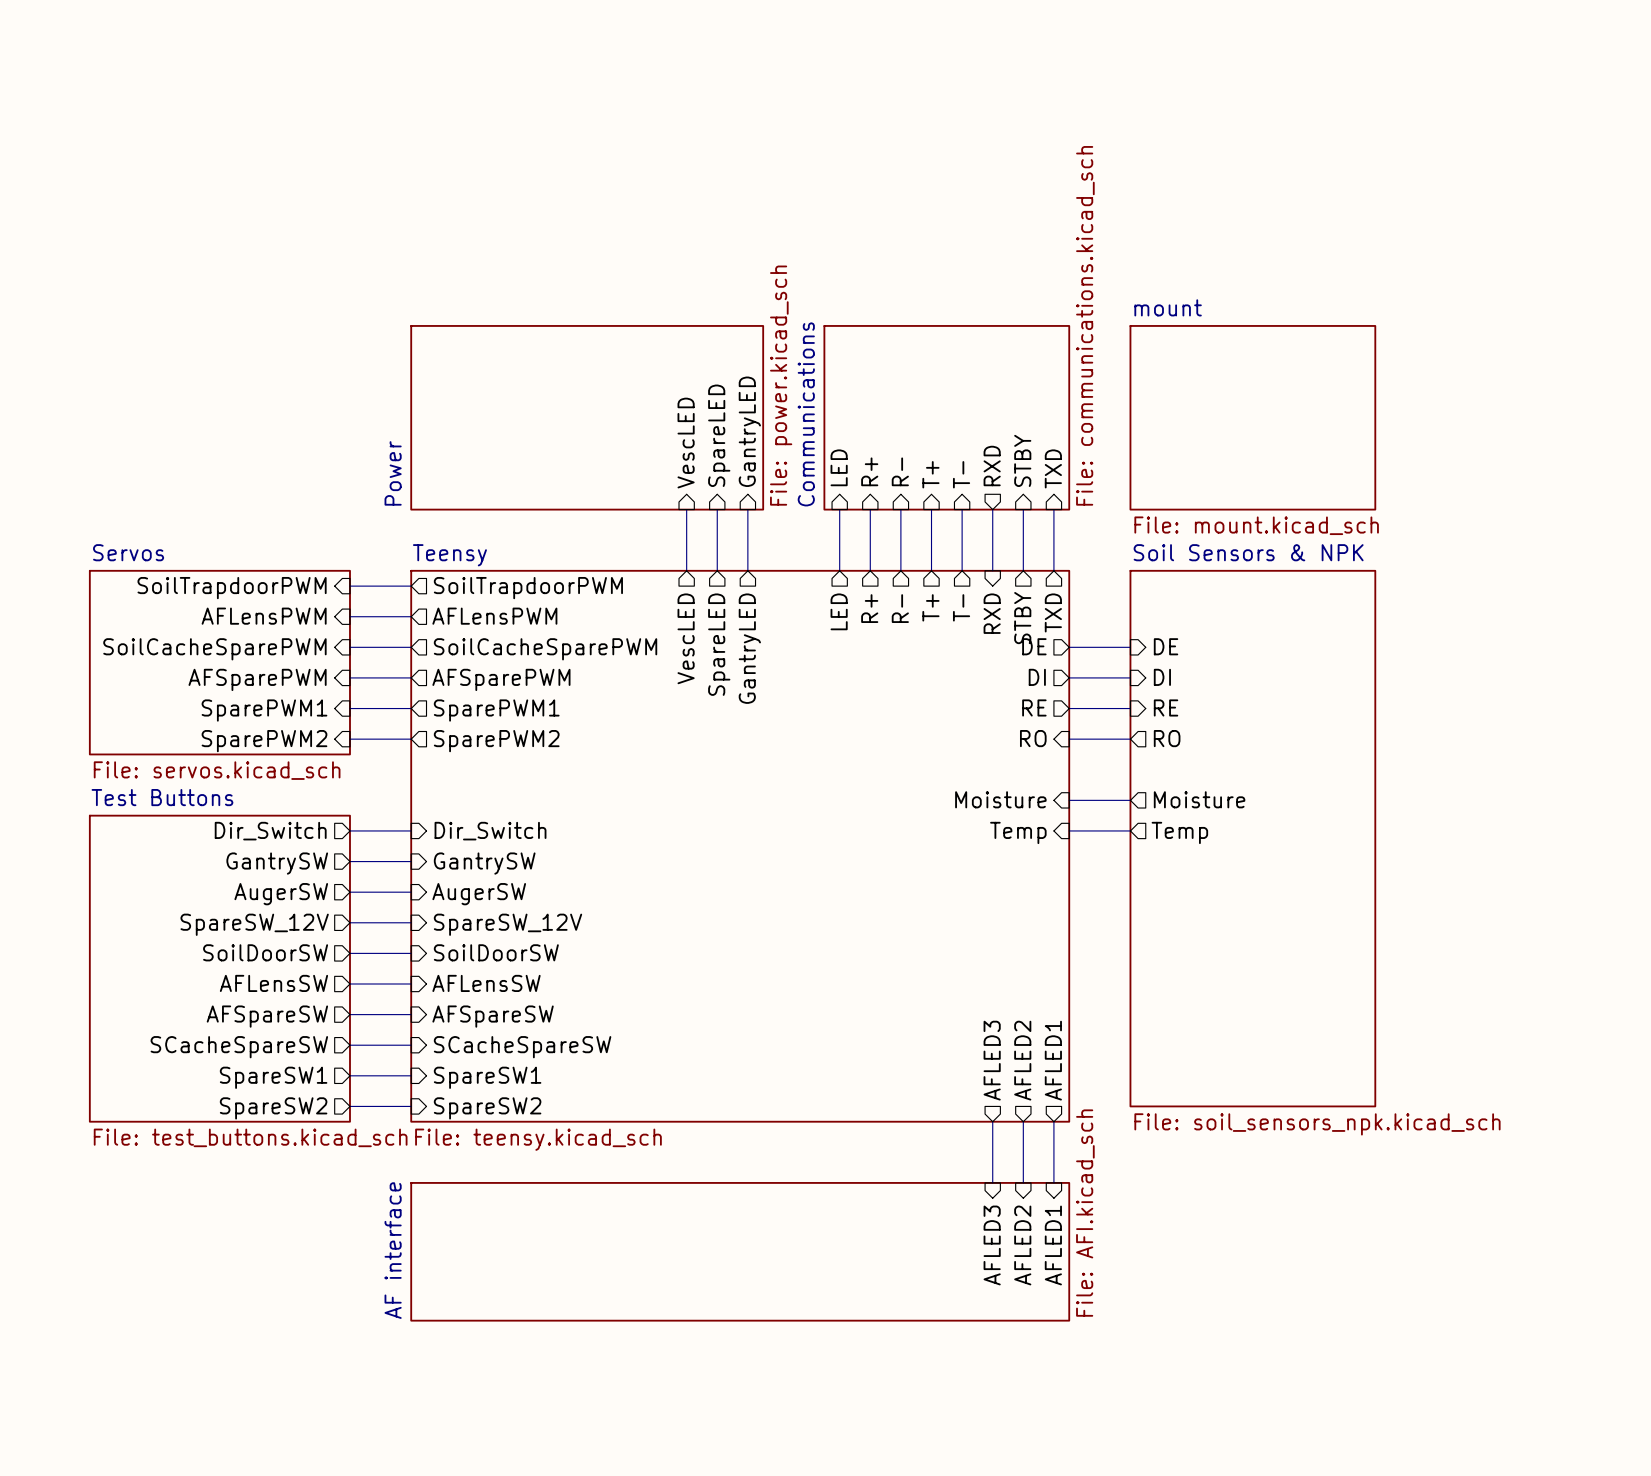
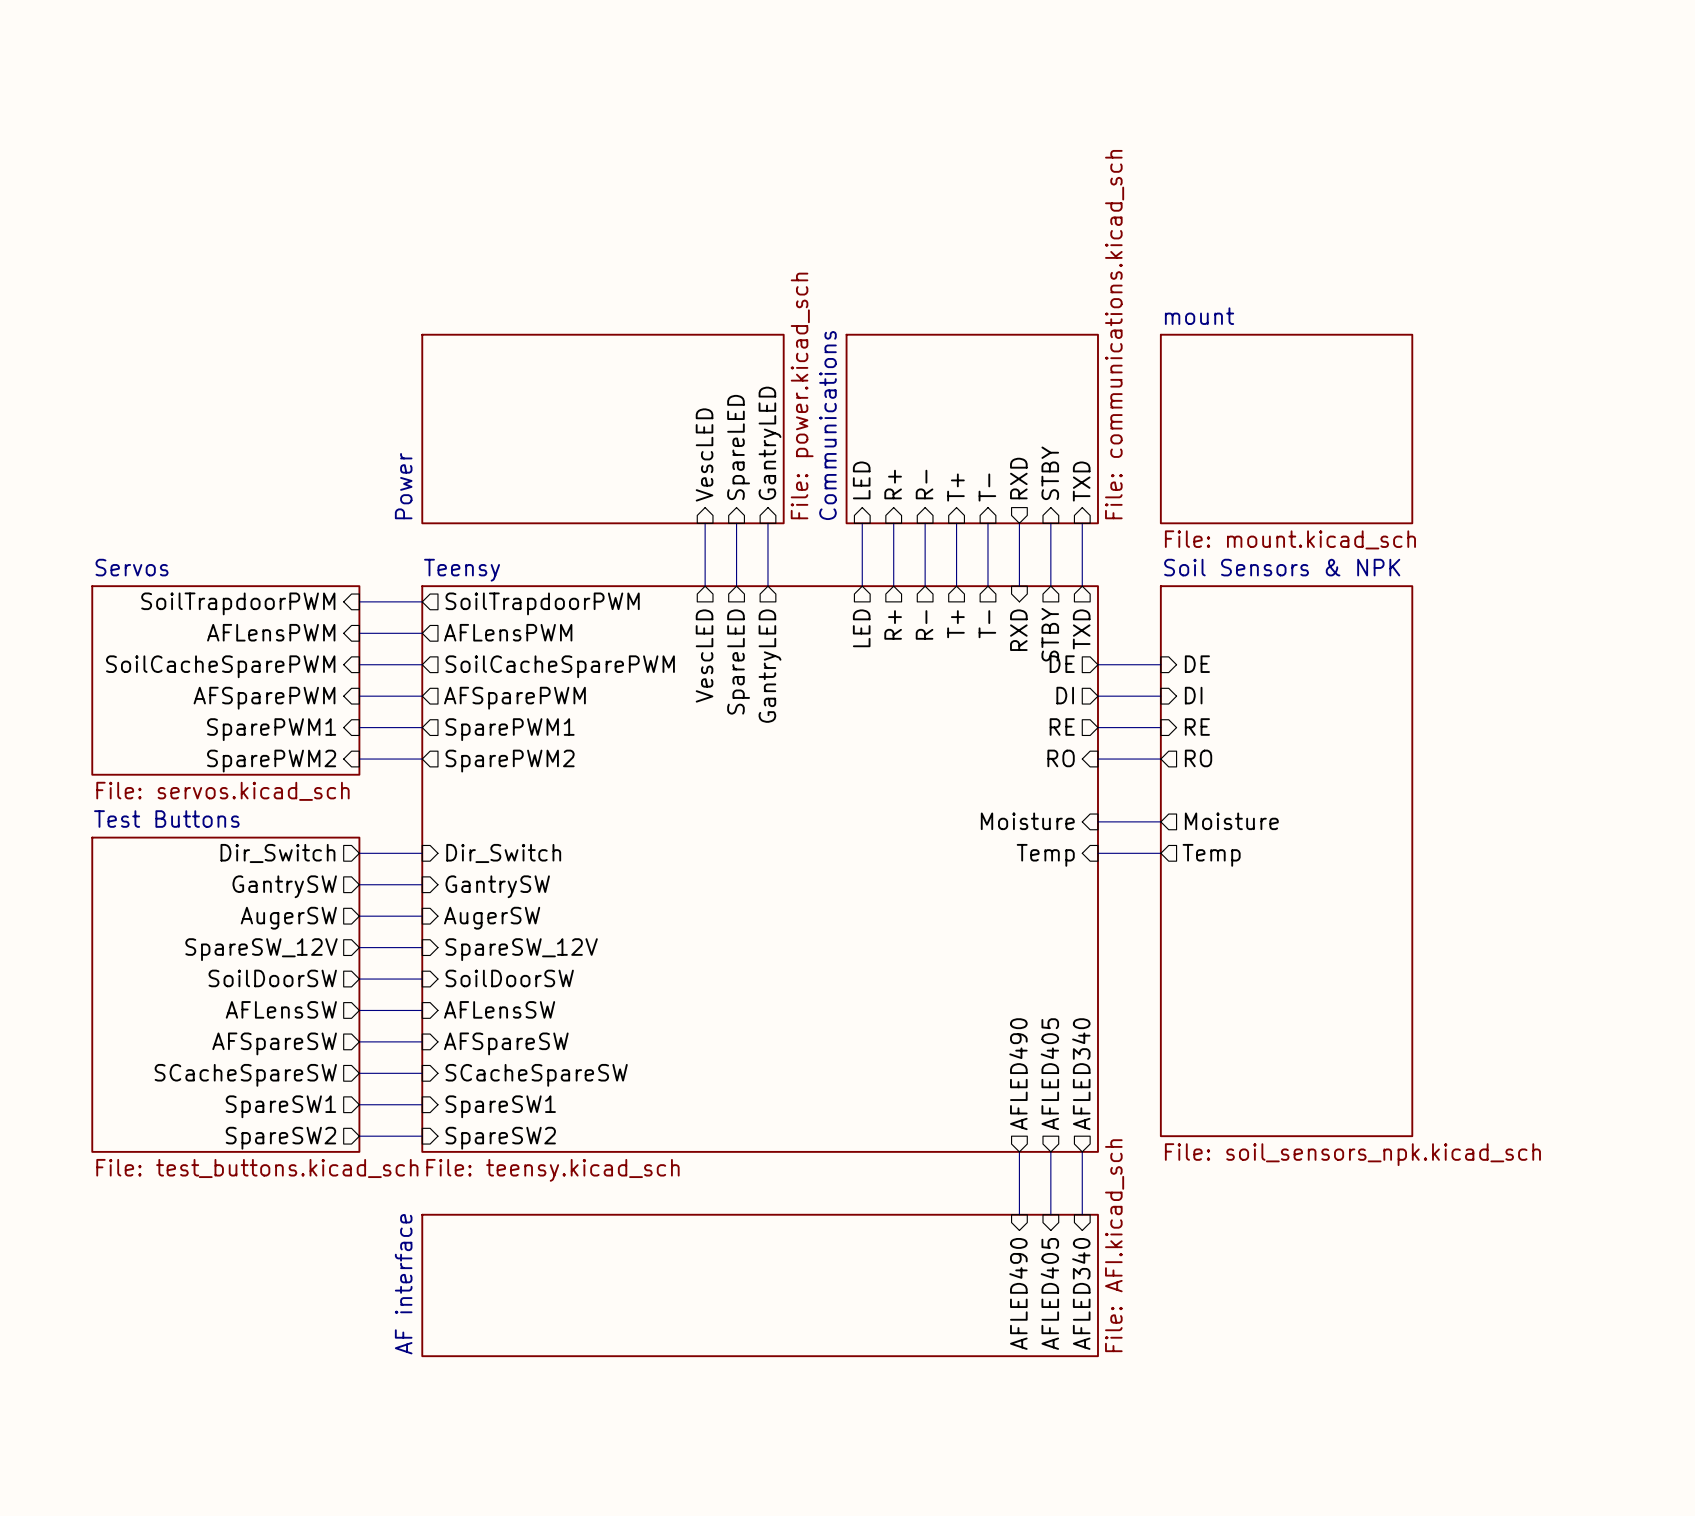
sheet pin: AFLED3 (992, 1060) -> AFLED490 (1018, 1074)
sheet pin: AFLED2 (1022, 1060) -> AFLED405 (1049, 1074)
sheet pin: AFLED1 (1053, 1060) -> AFLED340 (1081, 1074)
sheet pin: AFLED3 (992, 1245) -> AFLED490 (1018, 1293)
sheet pin: AFLED2 (1022, 1245) -> AFLED405 (1049, 1293)
sheet pin: AFLED1 (1053, 1245) -> AFLED340 (1081, 1293)

